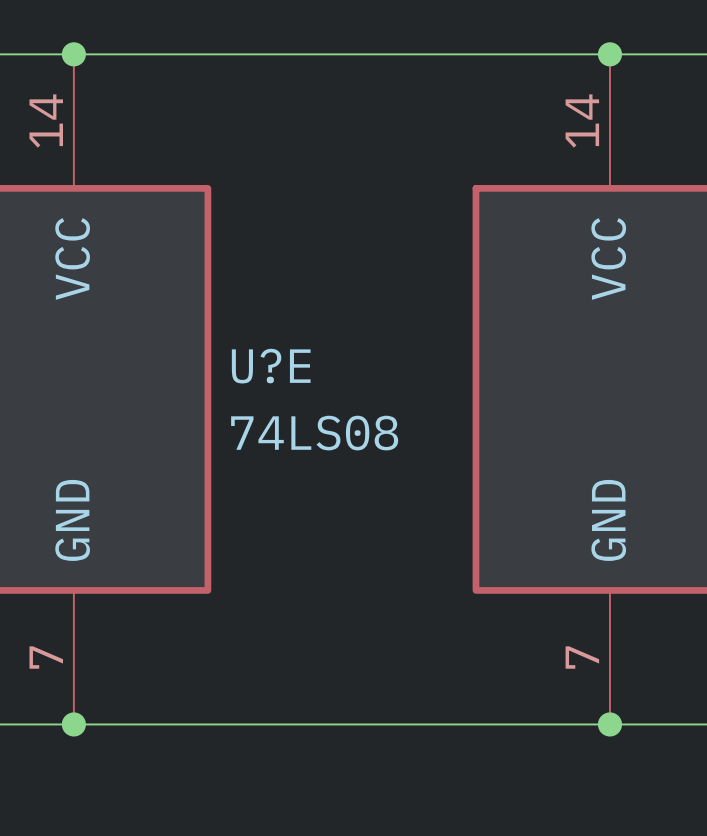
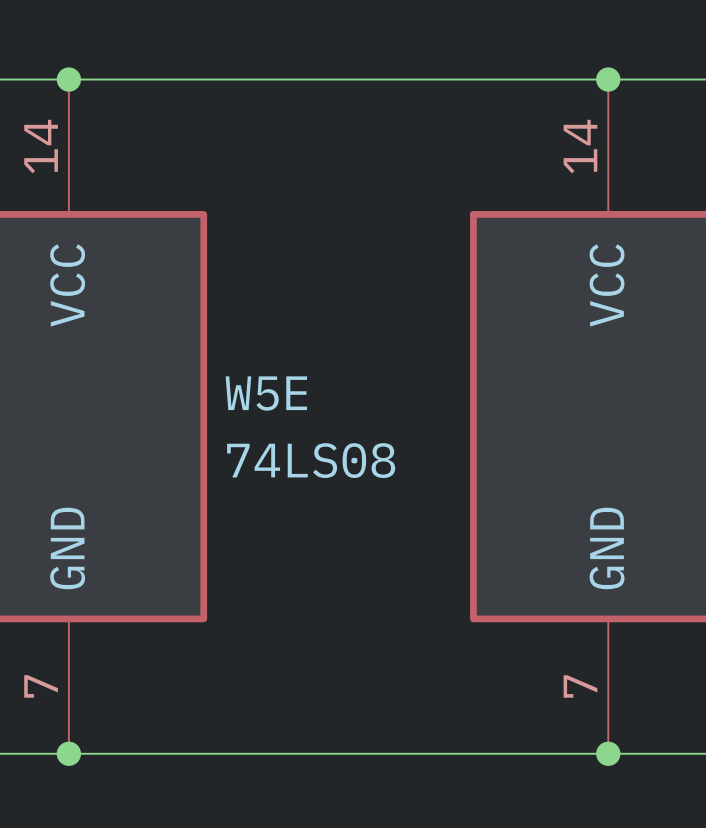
U?E name: U?E (271, 366) -> W5E (266, 393)

